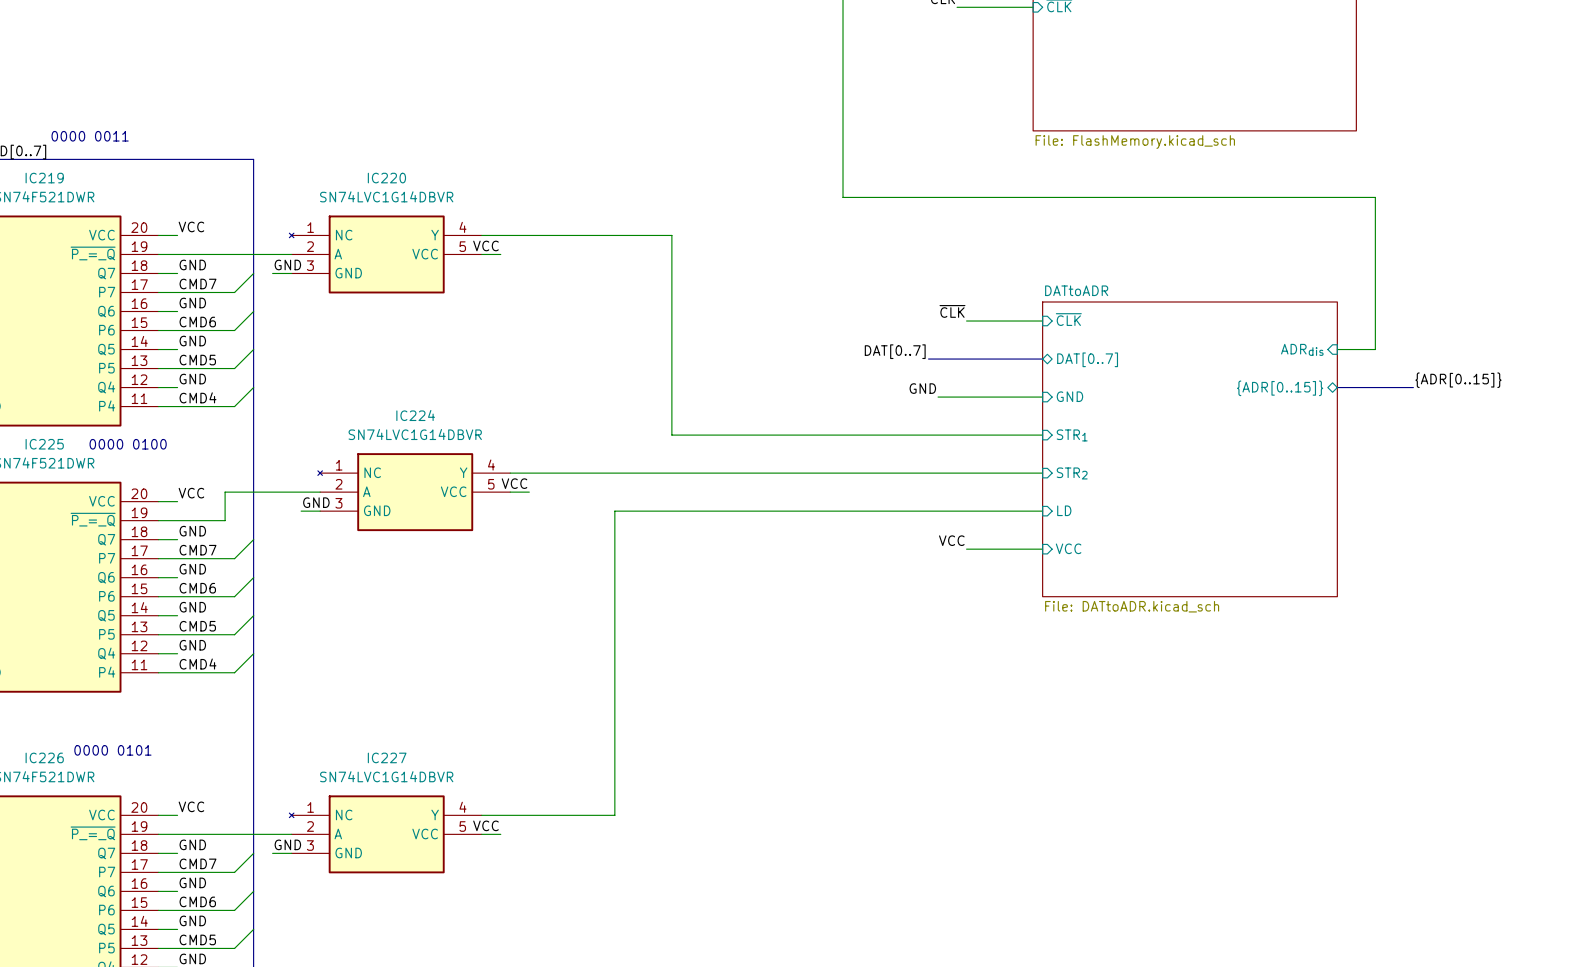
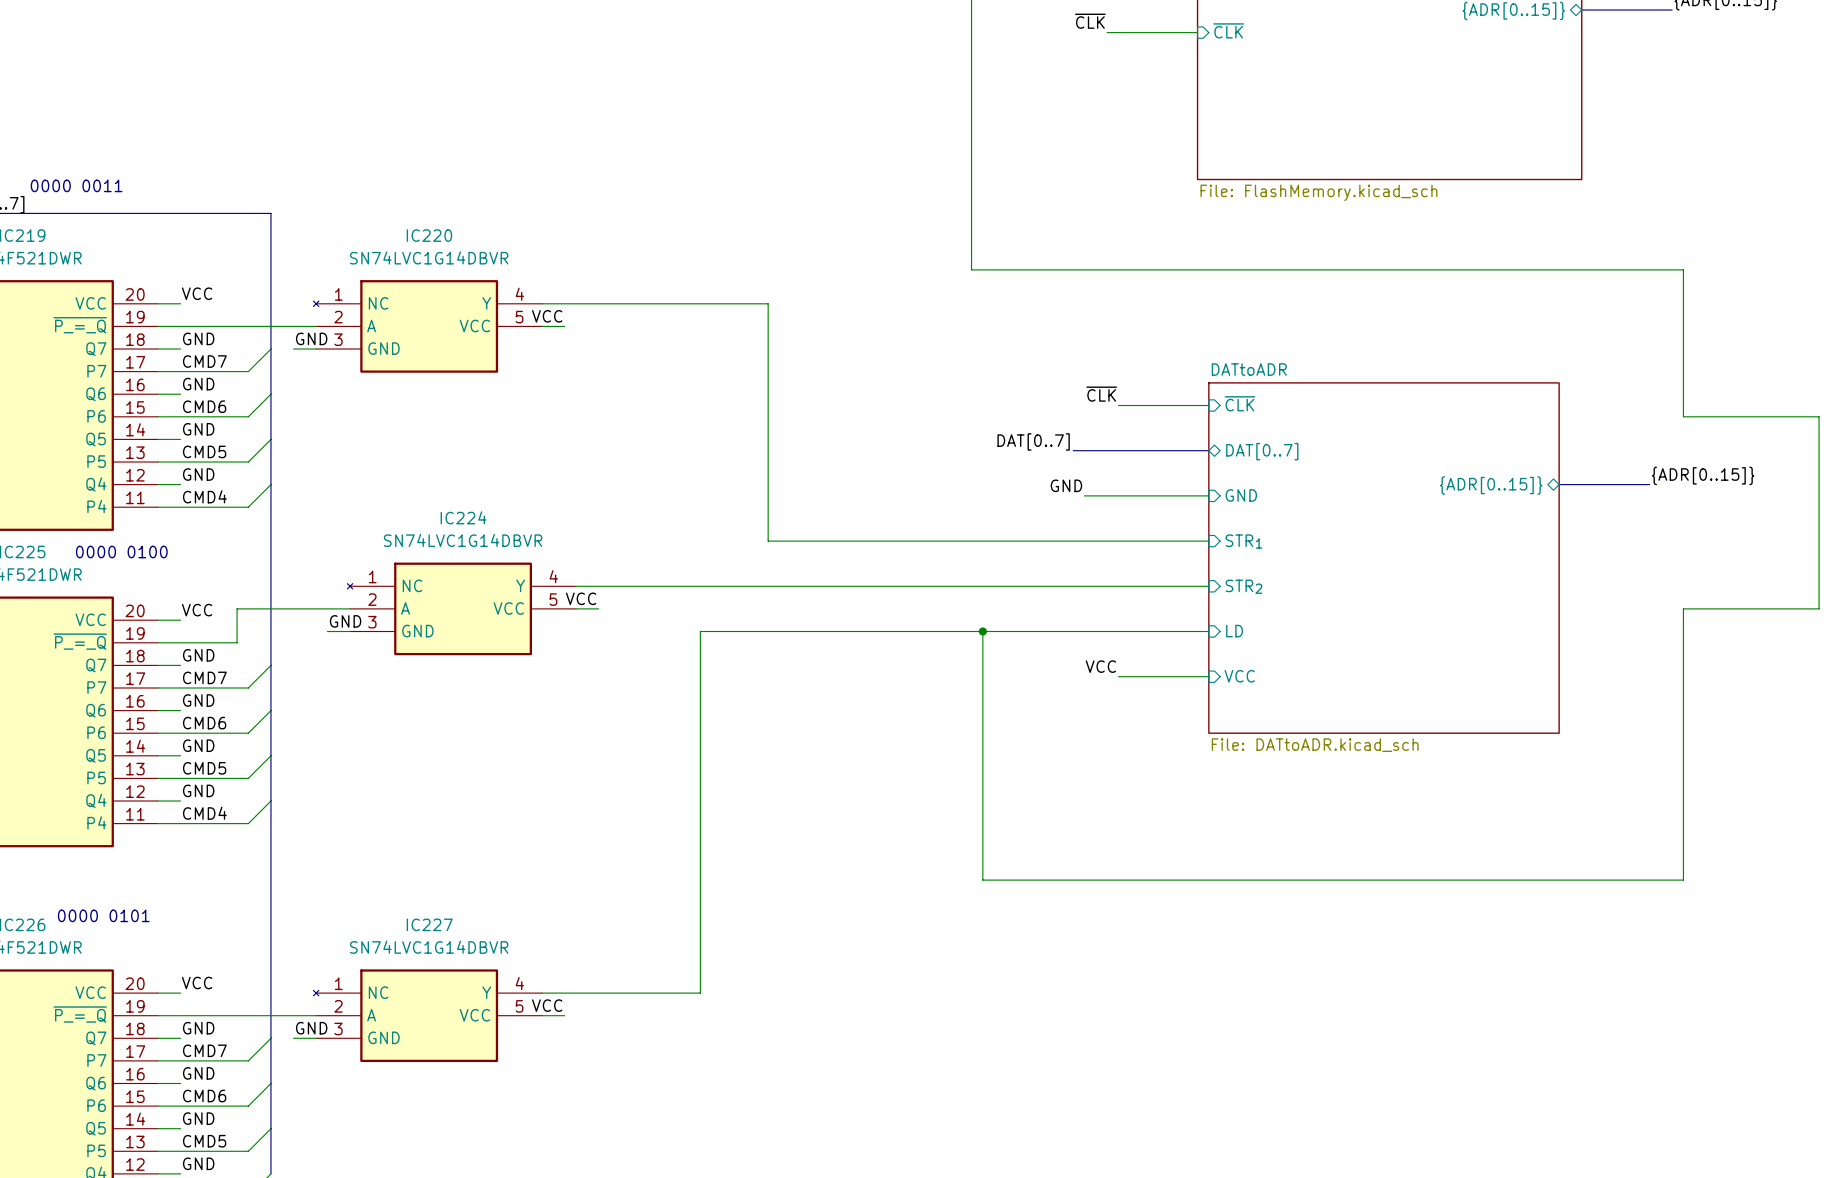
wire: (843, 197) (1375, 197) (1375, 349) (1337, 349) -> (971, 258) (971, 269) (1683, 269) (1683, 416) (1819, 416) (1819, 608) (1683, 608) (1683, 880) (982, 880) (982, 631)
sheet pin: ADRdis (1302, 349) -> none
junction: none -> (982, 631)

